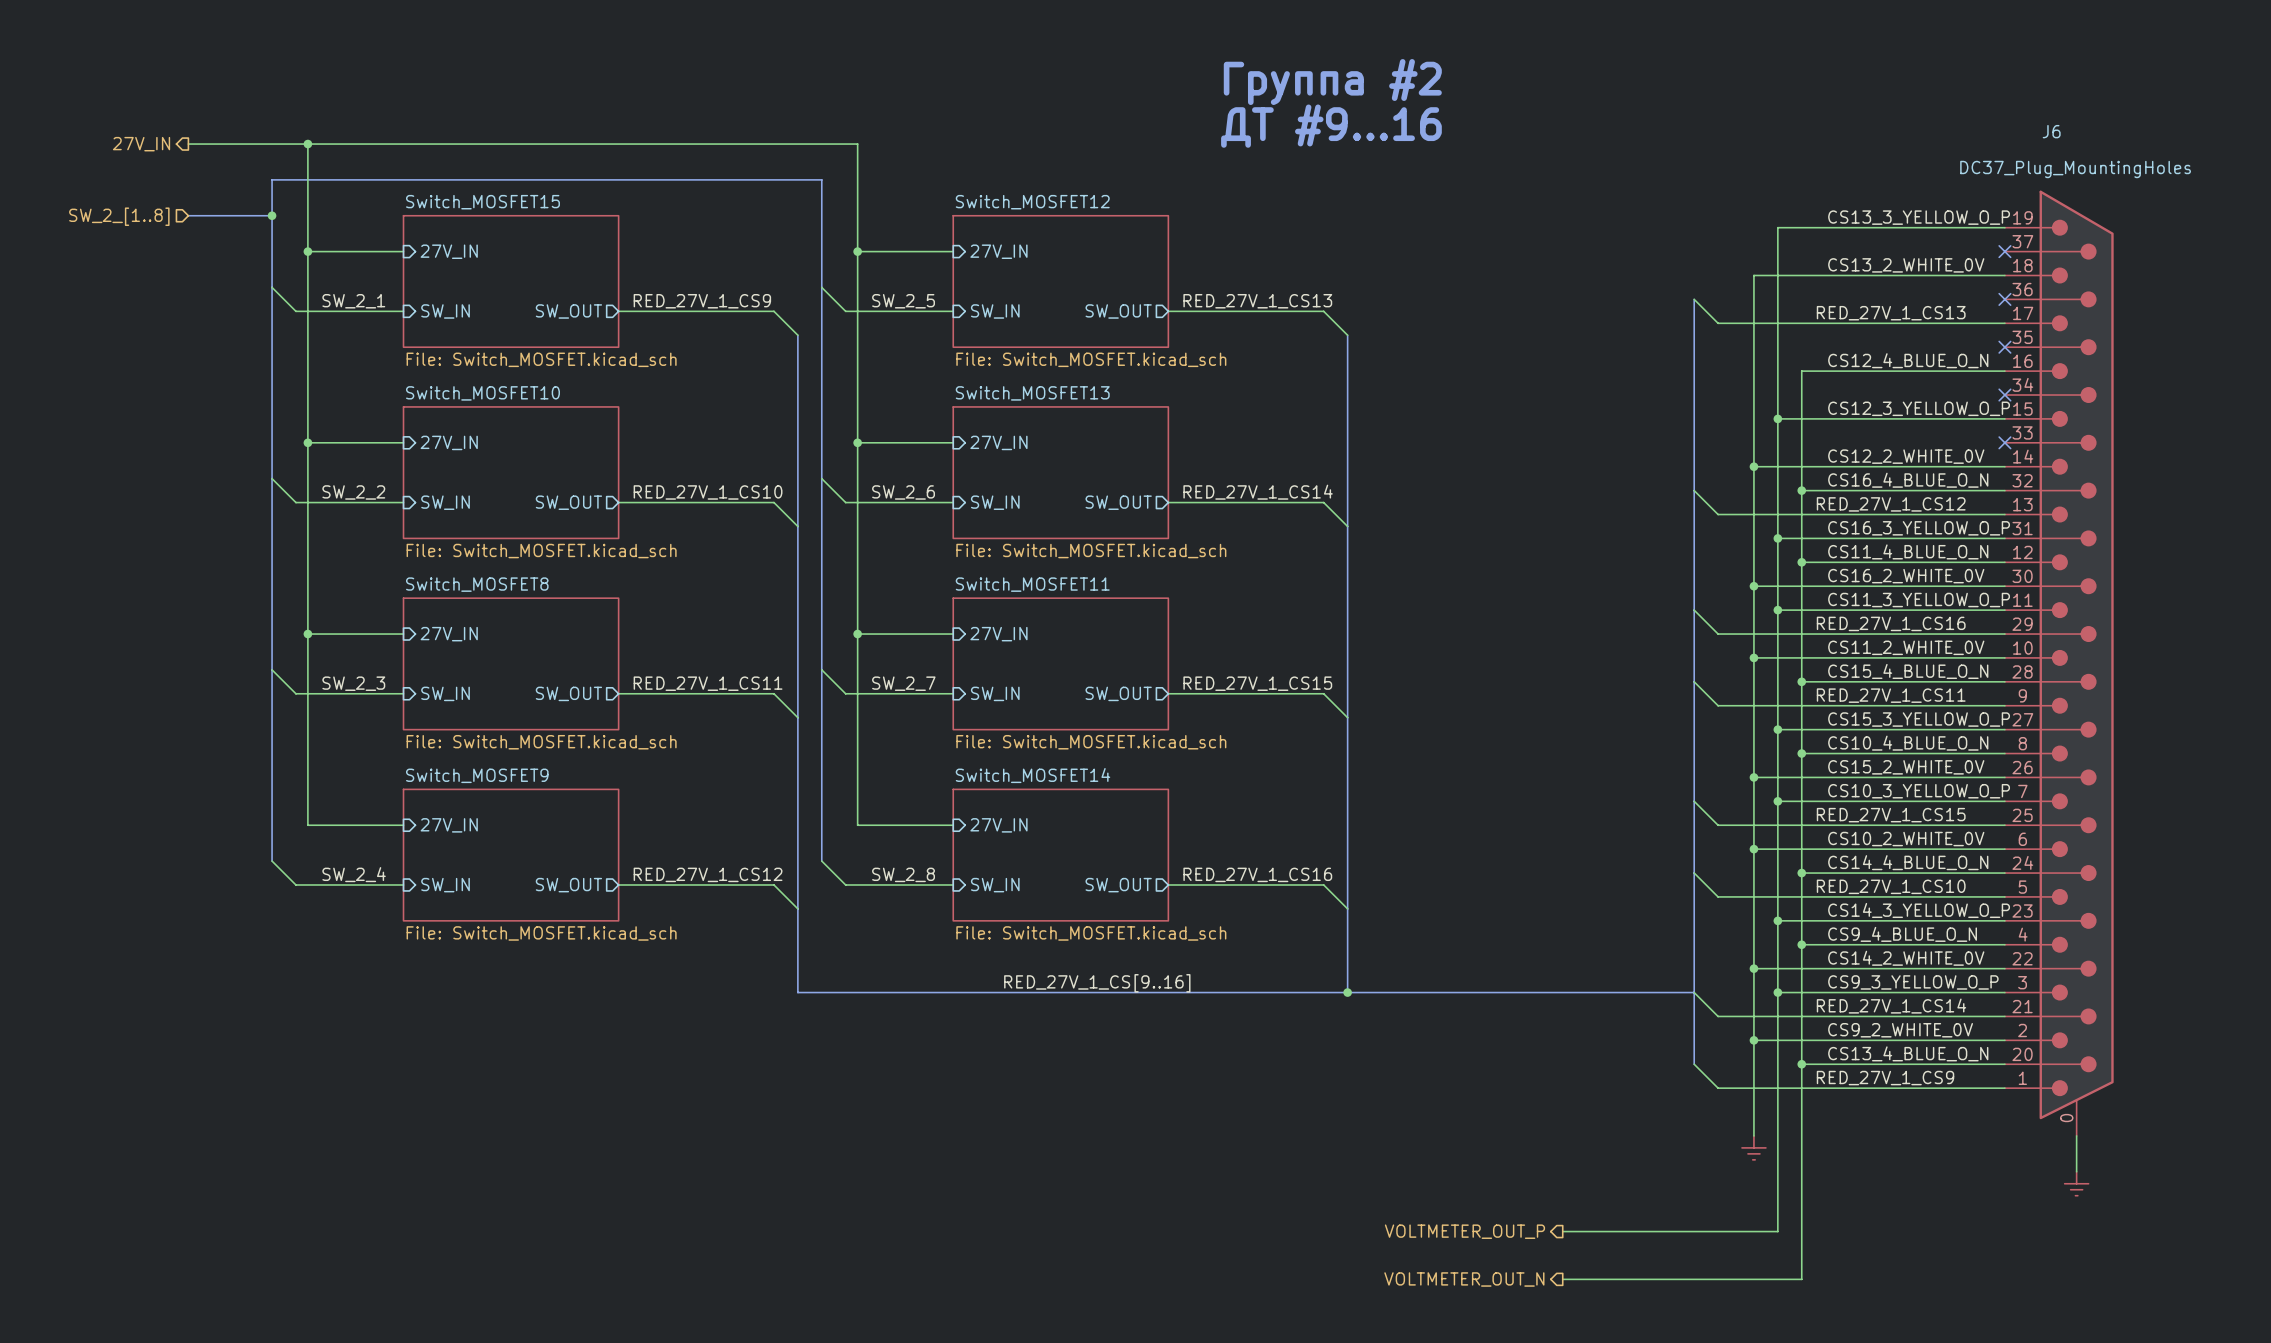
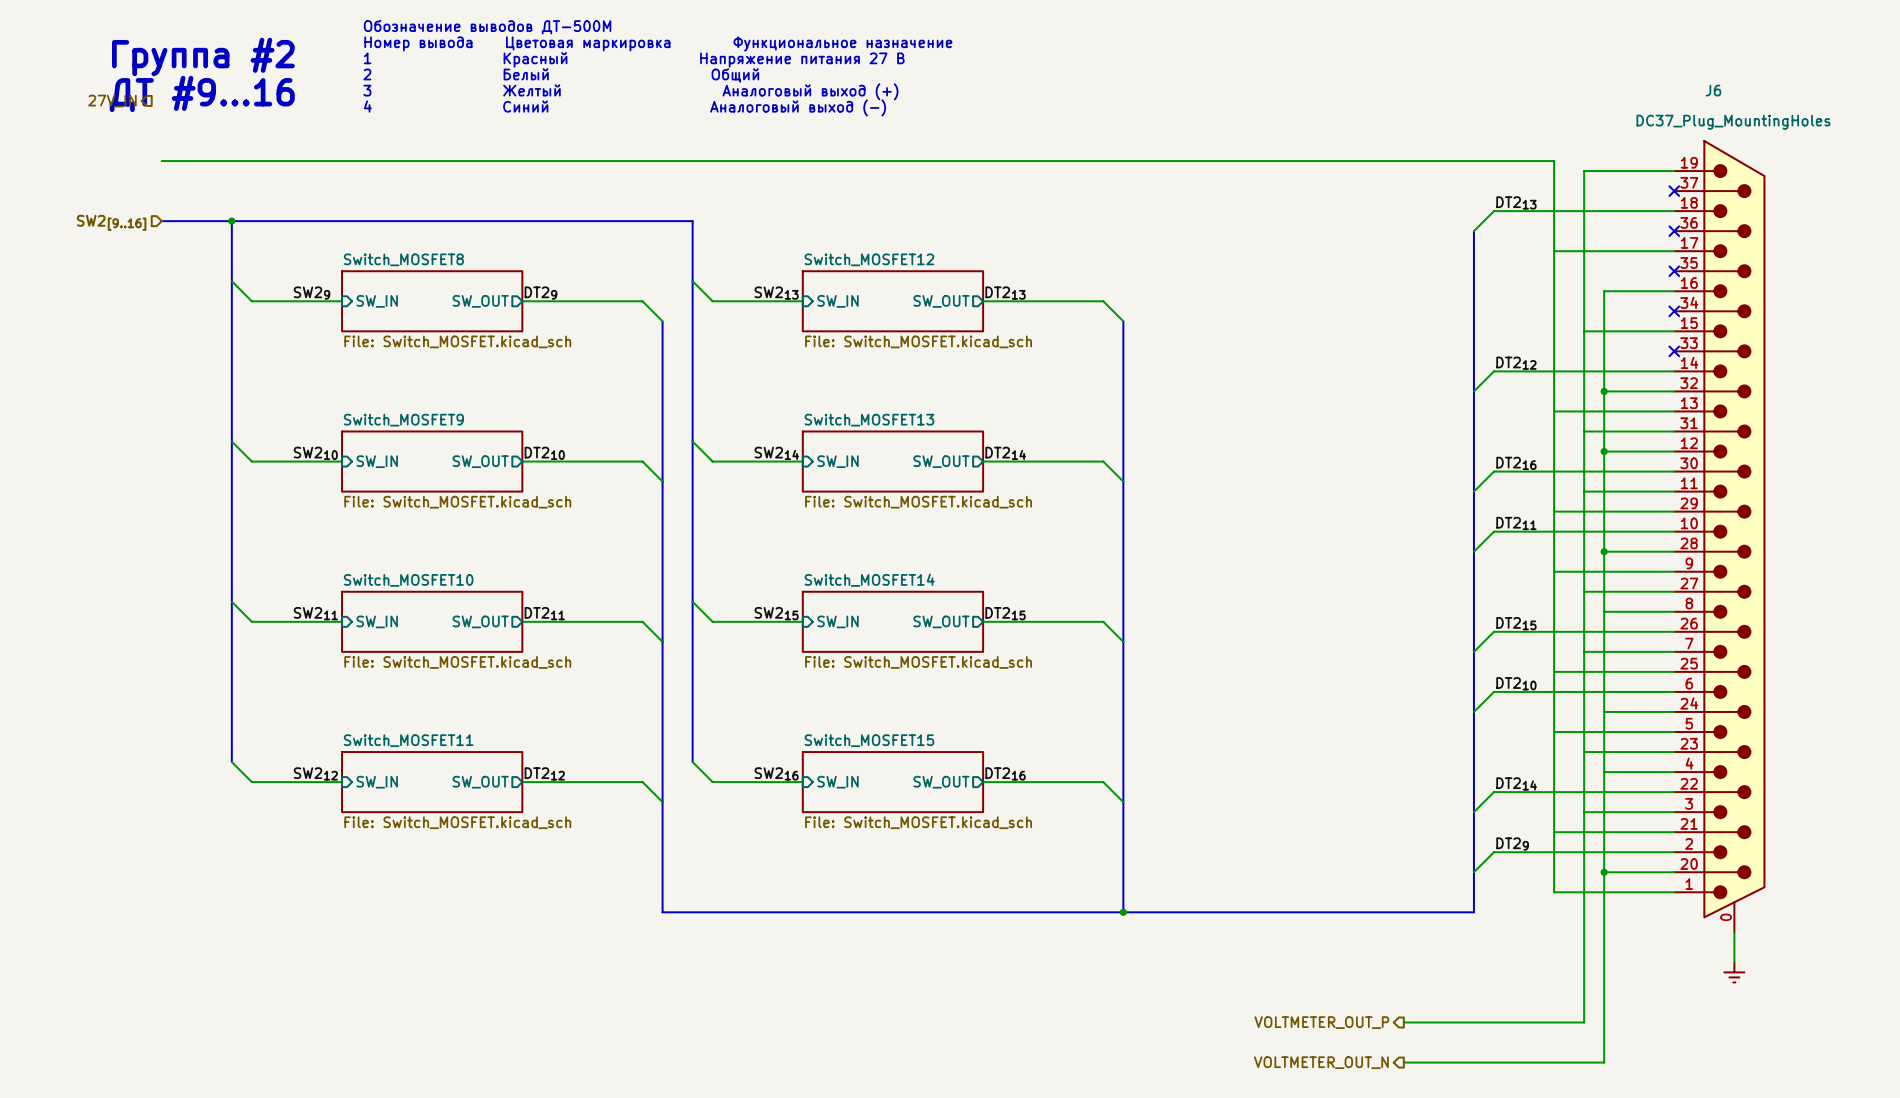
text: none -> Обозначение выводов ДТ-500М (487, 27)
text: none -> Номер вывода Цветовая маркировка Функциональное назначение (658, 43)
text: Группа #2 (1332, 82) -> none
text: none -> Группа #2 (203, 56)
text: none -> 1 Красный Напряжение питания 27 В (634, 59)
text: none -> 2 Белый Общий (561, 75)
text: ДТ #9...16 (1331, 126) -> none
text: none -> 3 Желтый Аналоговый выход (+) (630, 91)
text: none -> ДТ #9...16 (202, 93)
wire: (188, 144) (857, 144) (857, 825) (953, 825) -> none
wire: (307, 144) (307, 825) (403, 825) -> none
junction: (307, 144) -> none
text: none -> 4 Синий Аналоговый выход (-) (624, 107)
sheet Switch_MOSFET15 name position: Switch_MOSFET15 (482, 202) -> Switch_MOSFET15 (869, 740)
sheet Switch_MOSFET12 name position: Switch_MOSFET12 (1032, 202) -> Switch_MOSFET12 (869, 259)
bus: (188, 215) (272, 215) -> none
junction: (272, 215) -> none
sheet Switch_MOSFET15 shape: [402, 215, 620, 348] -> [802, 751, 984, 813]
sheet Switch_MOSFET12 shape: [952, 215, 1170, 348] -> [802, 270, 984, 332]
hierarchical label: SW_2_[1..8] (119, 216) -> none
label: CS13_3_YELLOW_O_P (1919, 217) -> none
wire: (1897, 227) (1777, 227) (1777, 1231) (1562, 1231) -> (1584, 171) (1584, 1022) (1403, 1022)
wire: (307, 251) (403, 251) -> none
junction: (307, 251) -> none
sheet pin: 27V_IN (449, 251) -> none
wire: (857, 251) (953, 251) -> none
junction: (857, 251) -> none
sheet pin: 27V_IN (998, 251) -> none
label: none -> DT213 (1516, 202)
label: CS13_2_WHITE_0V (1906, 265) -> none
wire: (1789, 275) (1753, 275) (1753, 1135) -> (1493, 211) (1473, 231)
bus: none -> (161, 221) (692, 221) (692, 762)
wire: (272, 287) (295, 311) (403, 311) -> (231, 281) (251, 301) (342, 301)
bus: none -> (231, 221) (231, 762)
junction: none -> (231, 221)
wire: (821, 287) (845, 311) (953, 311) -> (692, 281) (712, 301) (802, 301)
hierarchical label: none -> SW2[9..16] (111, 222)
wire: (1694, 299) (1718, 323) (1861, 323) -> none
bus: (1694, 299) (1694, 1064) -> none
label: SW_2_1 (353, 301) -> none
label: RED_27V_1_CS9 (702, 301) -> none
label: SW_2_5 (903, 301) -> none
label: RED_27V_1_CS13 (1257, 301) -> none
sheet pin: SW_IN (445, 311) -> none
sheet pin: SW_OUT (568, 311) -> none
wire: (618, 311) (773, 311) (797, 335) -> none
sheet pin: SW_IN (995, 311) -> none
sheet pin: SW_OUT (1118, 311) -> none
wire: (1168, 311) (1323, 311) (1347, 335) -> none
label: RED_27V_1_CS13 (1891, 313) -> none
bus: (797, 335) (797, 406) -> none
bus: (1347, 335) (1347, 406) -> none
sheet Switch_MOSFET15 value position: File: Switch_MOSFET.kicad_sch (541, 359) -> File: Switch_MOSFET.kicad_sch (918, 822)
sheet Switch_MOSFET12 value position: File: Switch_MOSFET.kicad_sch (1091, 359) -> File: Switch_MOSFET.kicad_sch (918, 341)
label: CS12_4_BLUE_O_N (1908, 360) -> none
wire: (1921, 371) (1801, 371) (1801, 1279) (1562, 1279) -> (1604, 291) (1604, 1062) (1403, 1062)
label: none -> SW29 (312, 293)
label: none -> DT29 (540, 293)
label: none -> SW213 (776, 293)
label: none -> DT213 (1005, 293)
sheet pin: none -> SW_IN (377, 301)
sheet pin: none -> SW_OUT (480, 301)
wire: none -> (522, 301) (642, 301) (662, 321)
sheet pin: none -> SW_IN (838, 301)
sheet pin: none -> SW_OUT (941, 301)
wire: none -> (983, 301) (1103, 301) (1123, 321)
sheet Switch_MOSFET10 name position: Switch_MOSFET10 (482, 393) -> Switch_MOSFET10 (408, 580)
sheet Switch_MOSFET13 name position: Switch_MOSFET13 (1032, 393) -> Switch_MOSFET13 (869, 420)
sheet Switch_MOSFET10 shape: [402, 406, 620, 540] -> [341, 591, 523, 653]
sheet Switch_MOSFET13 shape: [952, 406, 1170, 540] -> [802, 430, 984, 493]
label: CS12_3_YELLOW_O_P (1919, 408) -> none
wire: (1777, 418) (1897, 418) -> none
junction: (1777, 418) -> none
wire: (307, 442) (403, 442) -> none
junction: (307, 442) -> none
sheet pin: 27V_IN (449, 442) -> none
wire: (857, 442) (953, 442) -> none
junction: (857, 442) -> none
sheet pin: 27V_IN (998, 442) -> none
label: none -> DT212 (1516, 363)
label: CS12_2_WHITE_0V (1906, 456) -> none
wire: (1753, 466) (1789, 466) -> (1473, 391) (1493, 371)
junction: (1753, 466) -> none
wire: (272, 478) (295, 502) (403, 502) -> (231, 441) (251, 461) (342, 461)
wire: (821, 478) (845, 502) (953, 502) -> (692, 441) (712, 461) (802, 461)
label: CS16_4_BLUE_O_N (1908, 480) -> none
wire: (1694, 490) (1718, 514) (1861, 514) -> none
wire: (1801, 490) (1921, 490) -> none
junction: (1801, 490) -> none
junction: none -> (1604, 391)
label: SW_2_2 (353, 492) -> none
label: RED_27V_1_CS10 (708, 492) -> none
label: SW_2_6 (903, 492) -> none
label: RED_27V_1_CS14 (1258, 492) -> none
sheet pin: SW_IN (445, 502) -> none
sheet pin: SW_OUT (568, 502) -> none
wire: (618, 502) (773, 502) (797, 526) -> none
sheet pin: SW_IN (995, 502) -> none
sheet pin: SW_OUT (1118, 502) -> none
wire: (1168, 502) (1323, 502) (1347, 526) -> none
label: RED_27V_1_CS12 (1891, 504) -> none
label: CS16_3_YELLOW_O_P (1919, 528) -> none
wire: (1777, 538) (1897, 538) -> none
junction: (1777, 538) -> none
sheet Switch_MOSFET10 value position: File: Switch_MOSFET.kicad_sch (541, 551) -> File: Switch_MOSFET.kicad_sch (457, 662)
sheet Switch_MOSFET13 value position: File: Switch_MOSFET.kicad_sch (1091, 551) -> File: Switch_MOSFET.kicad_sch (918, 502)
label: CS11_4_BLUE_O_N (1908, 551) -> none
wire: (1801, 562) (1921, 562) -> none
junction: (1801, 562) -> none
junction: none -> (1604, 451)
label: none -> SW210 (315, 453)
label: none -> DT210 (544, 453)
label: none -> SW214 (776, 453)
label: none -> DT214 (1005, 453)
sheet pin: none -> SW_IN (377, 461)
sheet pin: none -> SW_OUT (480, 461)
wire: none -> (522, 461) (642, 461) (662, 481)
sheet pin: none -> SW_IN (838, 461)
sheet pin: none -> SW_OUT (941, 461)
wire: none -> (983, 461) (1103, 461) (1123, 481)
label: none -> DT216 (1516, 463)
label: CS16_2_WHITE_0V (1906, 576) -> none
sheet Switch_MOSFET8 name position: Switch_MOSFET8 (477, 584) -> Switch_MOSFET8 (403, 259)
sheet Switch_MOSFET11 name position: Switch_MOSFET11 (1032, 584) -> Switch_MOSFET11 (408, 740)
wire: (1753, 586) (1789, 586) -> (1473, 491) (1493, 471)
junction: (1753, 586) -> none
sheet Switch_MOSFET8 shape: [402, 597, 620, 731] -> [341, 270, 523, 332]
sheet Switch_MOSFET11 shape: [952, 597, 1170, 731] -> [341, 751, 523, 813]
label: CS11_3_YELLOW_O_P (1919, 600) -> none
wire: (1694, 610) (1718, 634) (1861, 634) -> none
wire: (1777, 610) (1897, 610) -> none
junction: (1777, 610) -> none
label: RED_27V_1_CS16 (1891, 623) -> none
wire: (307, 634) (403, 634) -> none
junction: (307, 634) -> none
sheet pin: 27V_IN (449, 634) -> none
wire: (857, 634) (953, 634) -> none
junction: (857, 634) -> none
sheet pin: 27V_IN (998, 634) -> none
label: CS11_2_WHITE_0V (1906, 647) -> none
label: none -> DT211 (1516, 523)
wire: (1753, 657) (1789, 657) -> (1473, 551) (1493, 531)
junction: (1753, 657) -> none
wire: (272, 669) (295, 693) (403, 693) -> (231, 601) (251, 621) (342, 621)
wire: (821, 669) (845, 693) (953, 693) -> (692, 601) (712, 621) (802, 621)
label: CS15_4_BLUE_O_N (1908, 671) -> none
wire: (1694, 681) (1718, 705) (1861, 705) -> none
wire: (1801, 681) (1921, 681) -> none
junction: (1801, 681) -> none
junction: none -> (1604, 551)
label: SW_2_3 (353, 683) -> none
label: RED_27V_1_CS11 (708, 683) -> none
label: SW_2_7 (903, 683) -> none
label: RED_27V_1_CS15 (1257, 683) -> none
sheet pin: SW_IN (445, 693) -> none
sheet pin: SW_OUT (568, 693) -> none
wire: (618, 693) (773, 693) (797, 717) -> none
sheet pin: SW_IN (995, 693) -> none
sheet pin: SW_OUT (1118, 693) -> none
wire: (1168, 693) (1323, 693) (1347, 717) -> none
label: RED_27V_1_CS11 (1891, 695) -> none
label: CS15_3_YELLOW_O_P (1919, 719) -> none
wire: (1777, 729) (1897, 729) -> none
junction: (1777, 729) -> none
sheet Switch_MOSFET8 value position: File: Switch_MOSFET.kicad_sch (541, 742) -> File: Switch_MOSFET.kicad_sch (457, 341)
sheet Switch_MOSFET11 value position: File: Switch_MOSFET.kicad_sch (1091, 742) -> File: Switch_MOSFET.kicad_sch (457, 822)
label: CS10_4_BLUE_O_N (1908, 743) -> none
wire: (1801, 753) (1921, 753) -> none
junction: (1801, 753) -> none
label: none -> SW211 (315, 613)
label: none -> DT211 (544, 613)
label: none -> SW215 (776, 613)
label: none -> DT215 (1005, 613)
sheet pin: none -> SW_IN (377, 621)
sheet pin: none -> SW_OUT (480, 621)
wire: none -> (522, 621) (642, 621) (662, 641)
sheet pin: none -> SW_IN (838, 621)
sheet pin: none -> SW_OUT (941, 621)
wire: none -> (983, 621) (1103, 621) (1123, 641)
label: none -> DT215 (1516, 623)
label: CS15_2_WHITE_0V (1906, 767) -> none
sheet Switch_MOSFET9 name position: Switch_MOSFET9 (477, 775) -> Switch_MOSFET9 (403, 420)
sheet Switch_MOSFET14 name position: Switch_MOSFET14 (1033, 775) -> Switch_MOSFET14 (869, 580)
wire: (1753, 777) (1789, 777) -> (1473, 651) (1493, 631)
junction: (1753, 777) -> none
sheet Switch_MOSFET9 shape: [402, 788, 620, 922] -> [341, 430, 523, 493]
sheet Switch_MOSFET14 shape: [952, 788, 1170, 922] -> [802, 591, 984, 653]
label: CS10_3_YELLOW_O_P (1919, 791) -> none
wire: (1694, 801) (1718, 825) (1861, 825) -> none
wire: (1777, 801) (1897, 801) -> none
junction: (1777, 801) -> none
label: RED_27V_1_CS15 (1891, 815) -> none
sheet pin: 27V_IN (449, 825) -> none
sheet pin: 27V_IN (998, 825) -> none
label: none -> DT210 (1516, 683)
label: CS10_2_WHITE_0V (1906, 839) -> none
wire: (1753, 849) (1789, 849) -> (1473, 711) (1493, 691)
junction: (1753, 849) -> none
wire: (272, 861) (295, 884) (403, 884) -> (231, 762) (251, 782) (342, 782)
bus: (272, 861) (272, 179) (821, 179) (821, 861) -> none
wire: (821, 861) (845, 884) (953, 884) -> (692, 762) (712, 782) (802, 782)
label: CS14_4_BLUE_O_N (1908, 862) -> none
wire: (1694, 873) (1718, 896) (1861, 896) -> none
wire: (1801, 873) (1921, 873) -> none
junction: (1801, 873) -> none
label: SW_2_4 (354, 874) -> none
label: RED_27V_1_CS12 (708, 874) -> none
label: SW_2_8 (903, 874) -> none
label: RED_27V_1_CS16 (1257, 874) -> none
wire: (618, 884) (773, 884) (797, 908) -> none
wire: (1168, 884) (1323, 884) (1347, 908) -> none
sheet pin: SW_IN (445, 885) -> none
sheet pin: SW_OUT (568, 885) -> none
sheet pin: SW_IN (995, 885) -> none
sheet pin: SW_OUT (1118, 885) -> none
label: RED_27V_1_CS10 (1891, 886) -> none
label: CS14_3_YELLOW_O_P (1919, 910) -> none
wire: (1777, 920) (1897, 920) -> none
junction: (1777, 920) -> none
sheet Switch_MOSFET9 value position: File: Switch_MOSFET.kicad_sch (541, 933) -> File: Switch_MOSFET.kicad_sch (457, 502)
sheet Switch_MOSFET14 value position: File: Switch_MOSFET.kicad_sch (1091, 933) -> File: Switch_MOSFET.kicad_sch (918, 662)
label: CS9_4_BLUE_O_N (1902, 934) -> none
wire: (1801, 944) (1921, 944) -> none
junction: (1801, 944) -> none
label: none -> SW212 (315, 773)
label: none -> DT212 (544, 773)
label: none -> SW216 (776, 773)
label: none -> DT216 (1005, 773)
sheet pin: none -> SW_IN (377, 782)
sheet pin: none -> SW_OUT (480, 782)
wire: none -> (522, 782) (642, 782) (662, 802)
sheet pin: none -> SW_IN (838, 782)
sheet pin: none -> SW_OUT (941, 782)
wire: none -> (983, 782) (1103, 782) (1123, 802)
label: none -> DT214 (1516, 783)
label: CS14_2_WHITE_0V (1906, 958) -> none
wire: (1753, 968) (1789, 968) -> (1473, 812) (1493, 792)
junction: (1753, 968) -> none
label: CS9_3_YELLOW_O_P (1913, 982) -> none
label: RED_27V_1_CS[9..16] (1097, 983) -> none
bus: (797, 992) (1694, 992) -> (662, 812) (662, 912) (1473, 912) (1473, 231)
bus: none -> (1123, 812) (1123, 912)
junction: (1347, 992) -> none
wire: (1694, 992) (1718, 1016) (1861, 1016) -> none
wire: (1777, 992) (1897, 992) -> none
junction: (1777, 992) -> none
label: RED_27V_1_CS14 (1891, 1006) -> none
label: none -> DT29 (1512, 844)
label: CS9_2_WHITE_0V (1900, 1030) -> none
wire: (1753, 1040) (1789, 1040) -> (1473, 872) (1493, 852)
junction: (1753, 1040) -> none
label: CS13_4_BLUE_O_N (1908, 1053) -> none
wire: (1694, 1064) (1718, 1088) (1861, 1088) -> (161, 161) (1554, 161) (1554, 892)
wire: (1801, 1064) (1921, 1064) -> none
junction: (1801, 1064) -> none
junction: none -> (1604, 872)
label: RED_27V_1_CS9 (1885, 1078) -> none
junction: none -> (1123, 912)
power symbol: (1753, 1147) -> none
hierarchical label position: VOLTMETER_OUT_P (1464, 1231) -> VOLTMETER_OUT_P (1321, 1022)
hierarchical label position: VOLTMETER_OUT_N (1464, 1279) -> VOLTMETER_OUT_N (1321, 1062)

